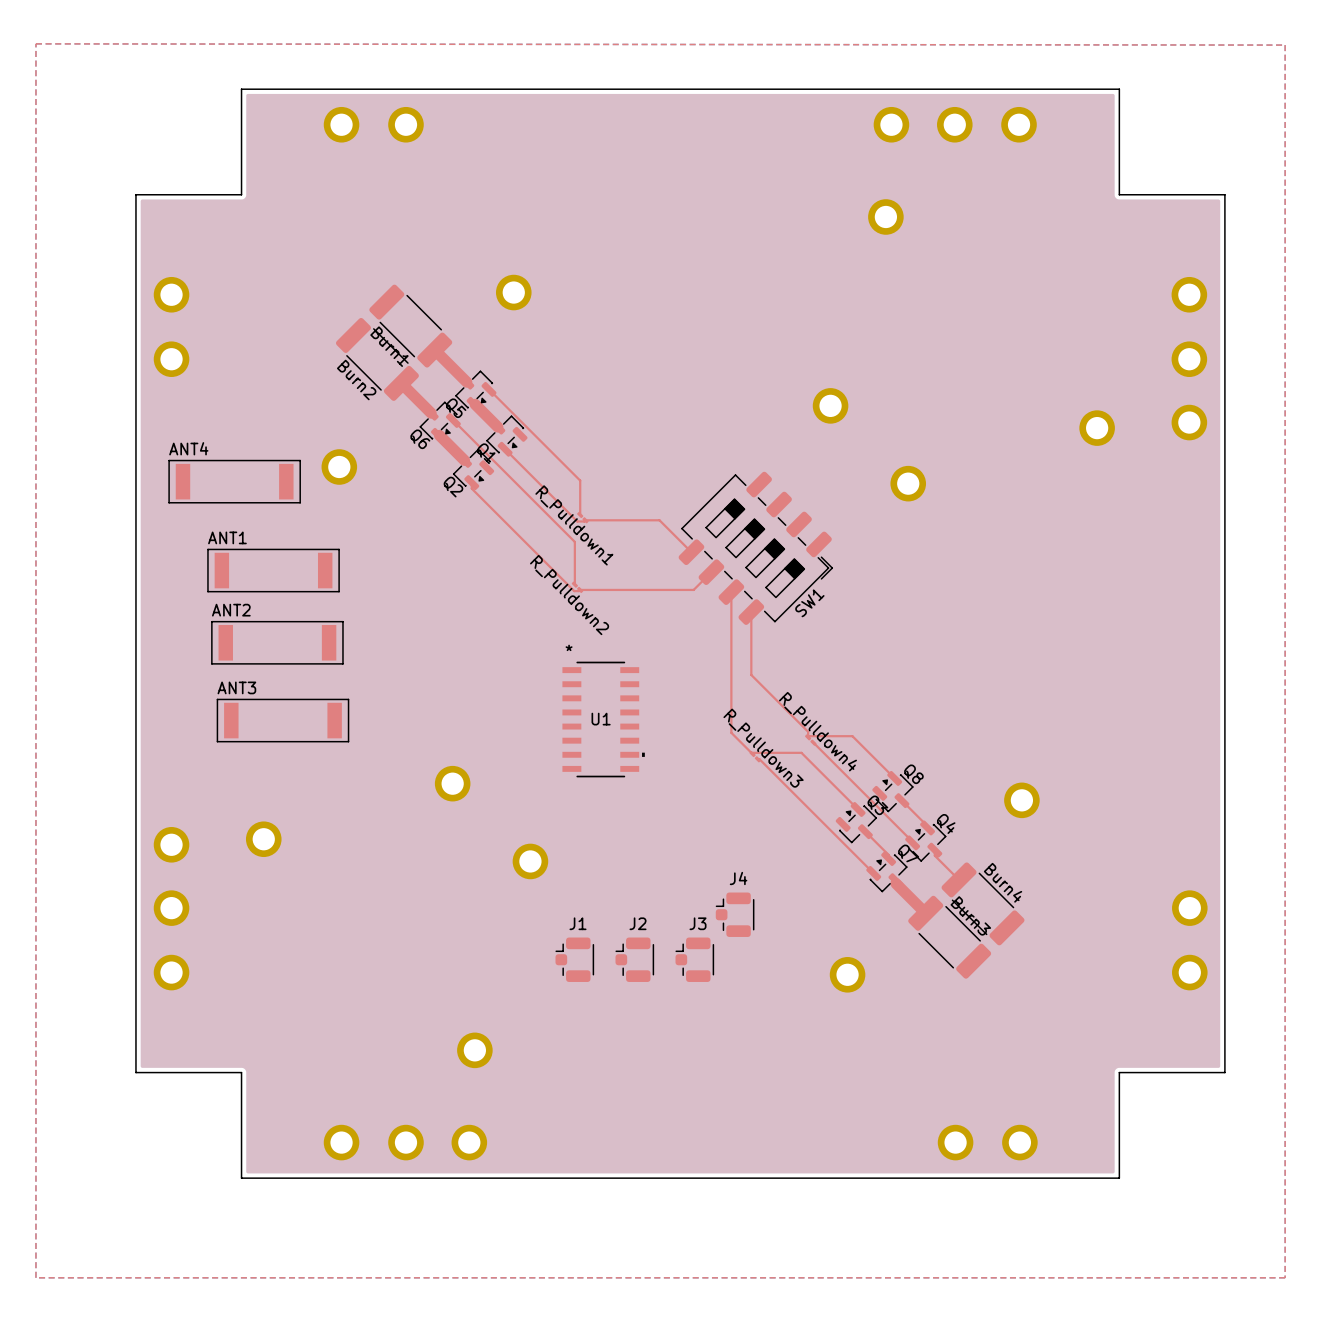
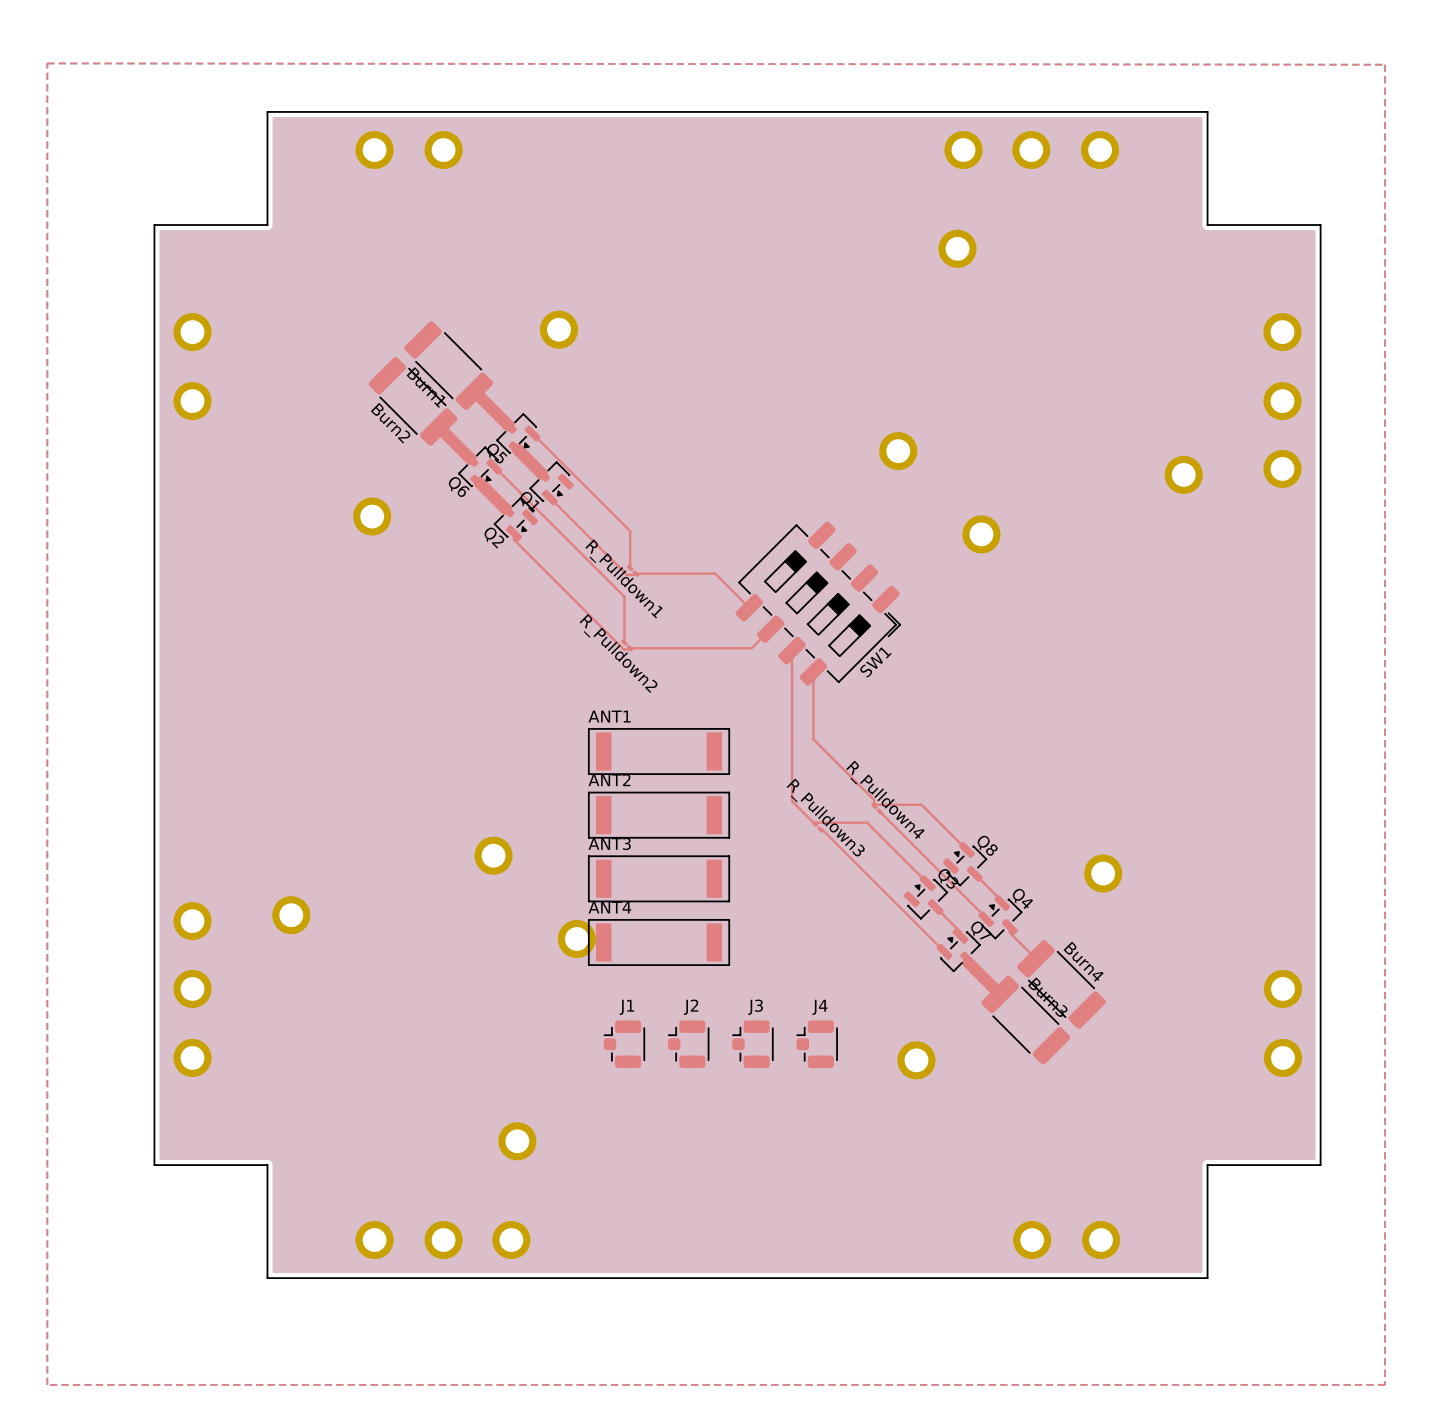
ANT4 position: (234, 481) -> (659, 942)
ANT1 position: (273, 570) -> (659, 751)
ANT2 position: (277, 642) -> (659, 815)
U1: (603, 719) -> none
ANT3 position: (282, 720) -> (659, 878)
J4 position: (735, 914) -> (817, 1044)

